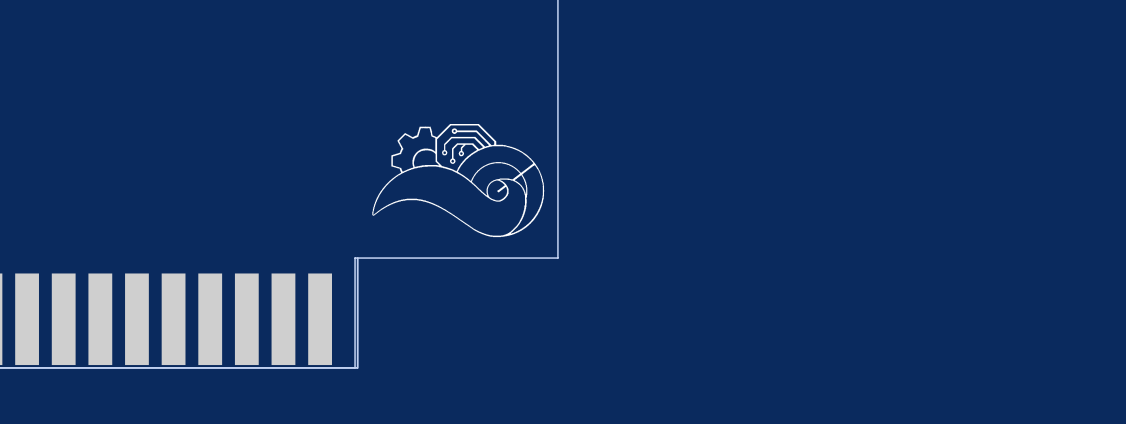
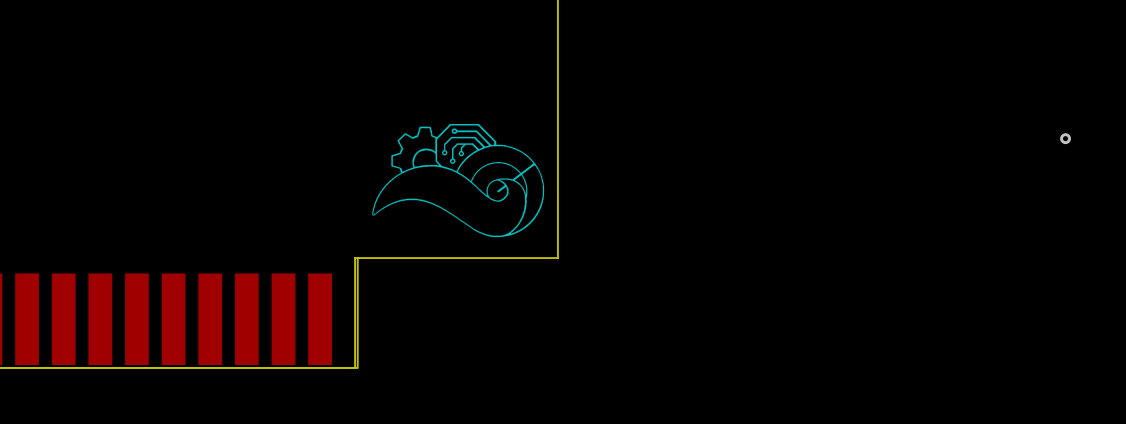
via: none -> (1065, 138)

